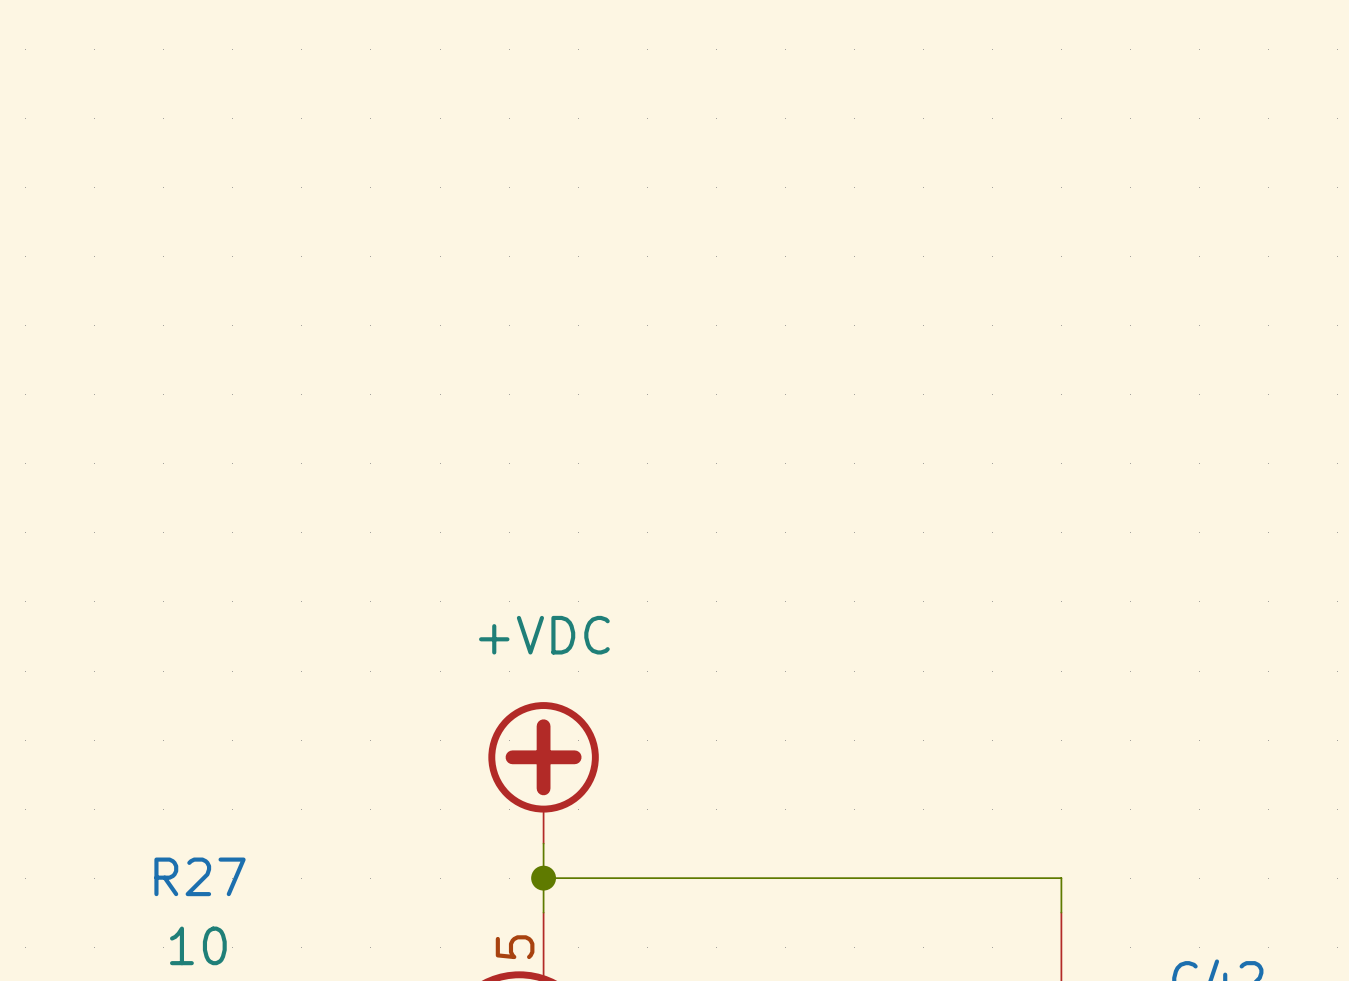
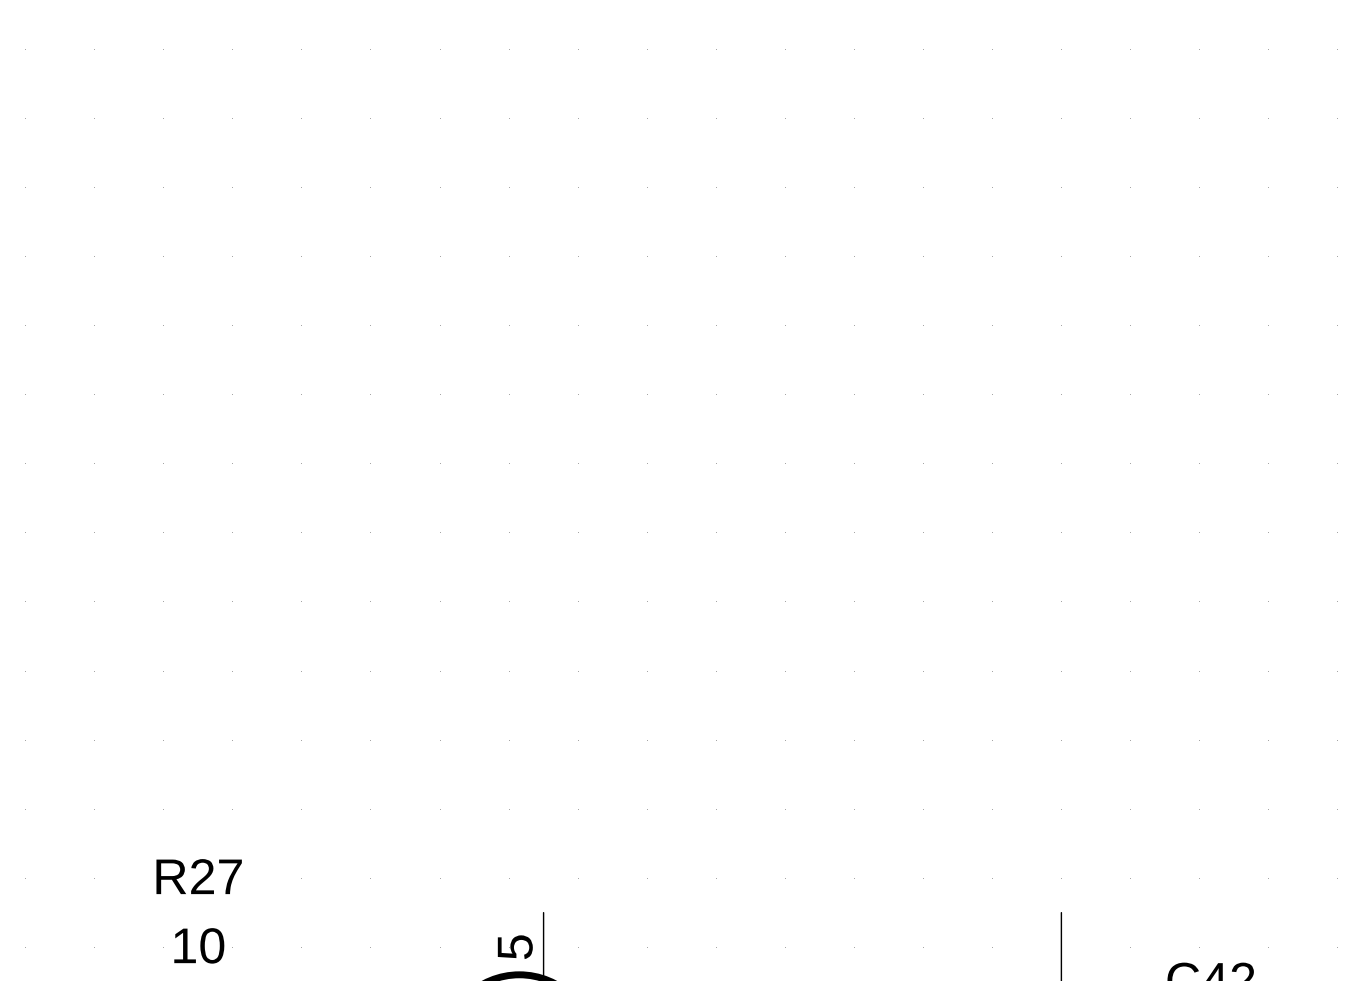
power symbol: +VDC (543, 772) -> none
wire: (543, 843) (543, 912) -> none
wire: (543, 878) (1061, 878) (1061, 912) -> none
junction: (543, 878) -> none

